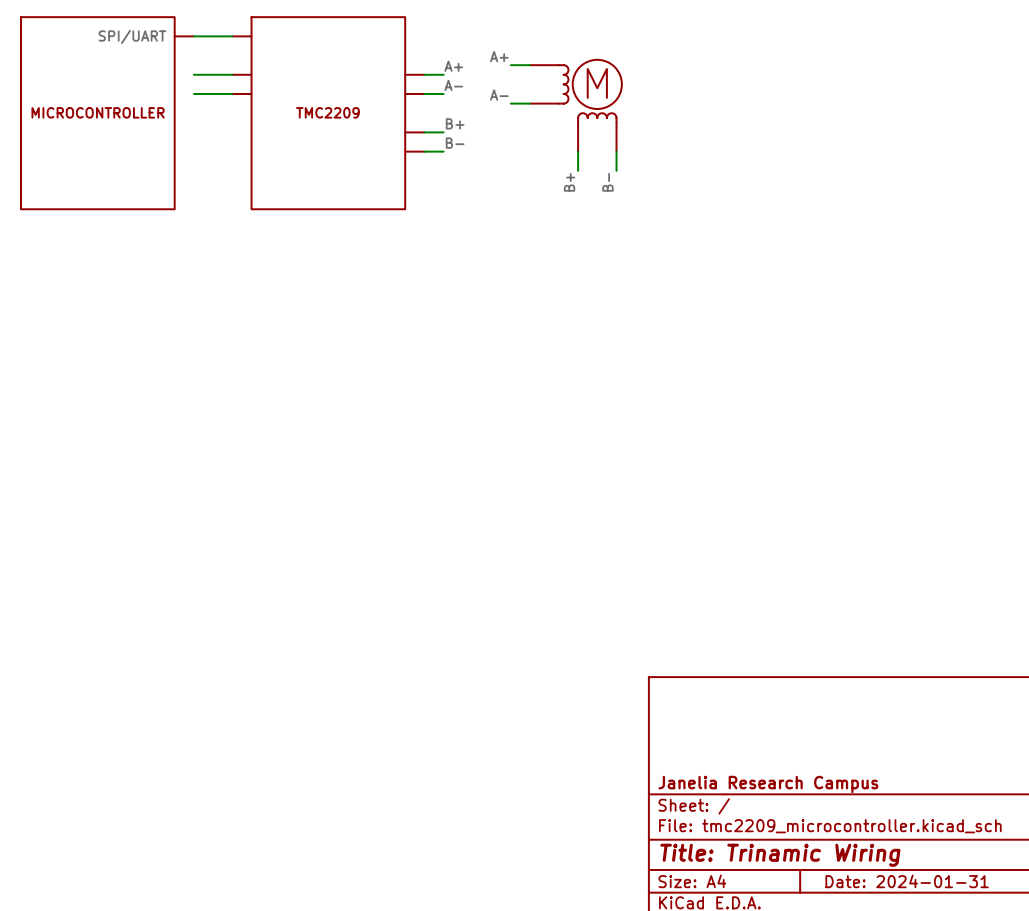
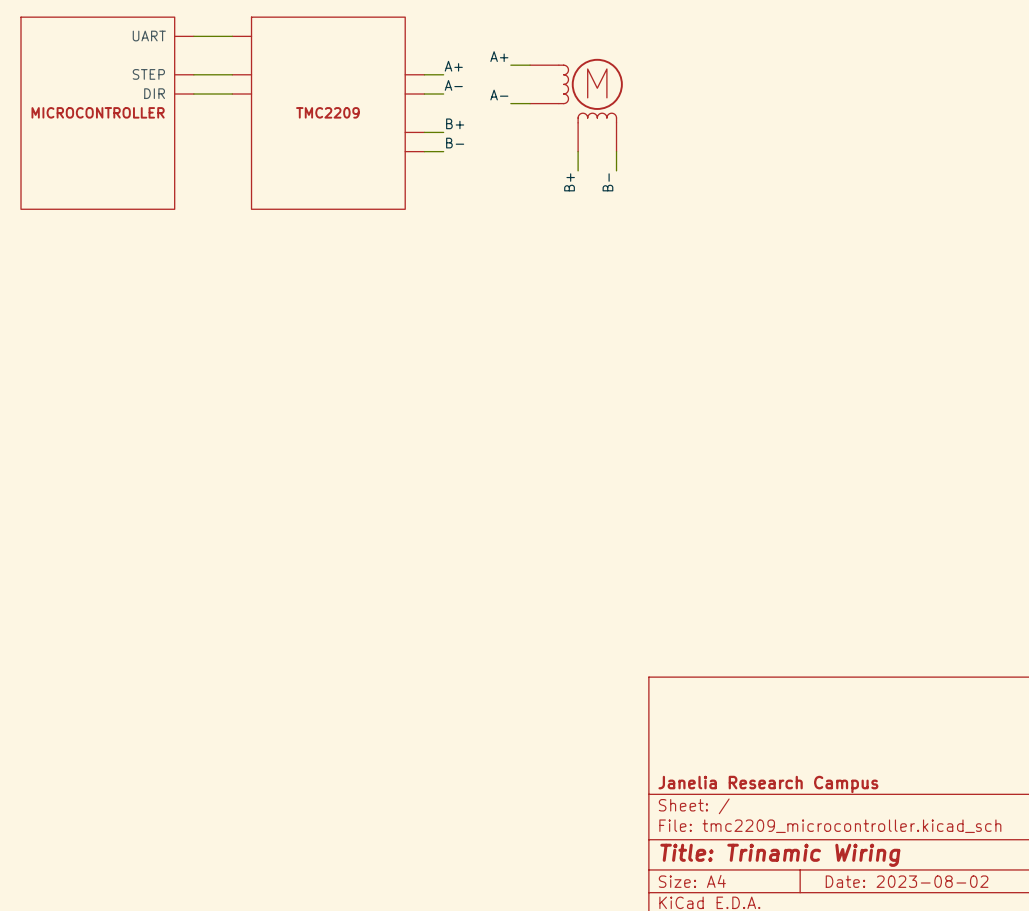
part symbol: [21, 17, 194, 210] -> [21, 17, 194, 210]
title block: Date: 2024-01-31 (907, 881) -> Date: 2023-08-02 (907, 881)

